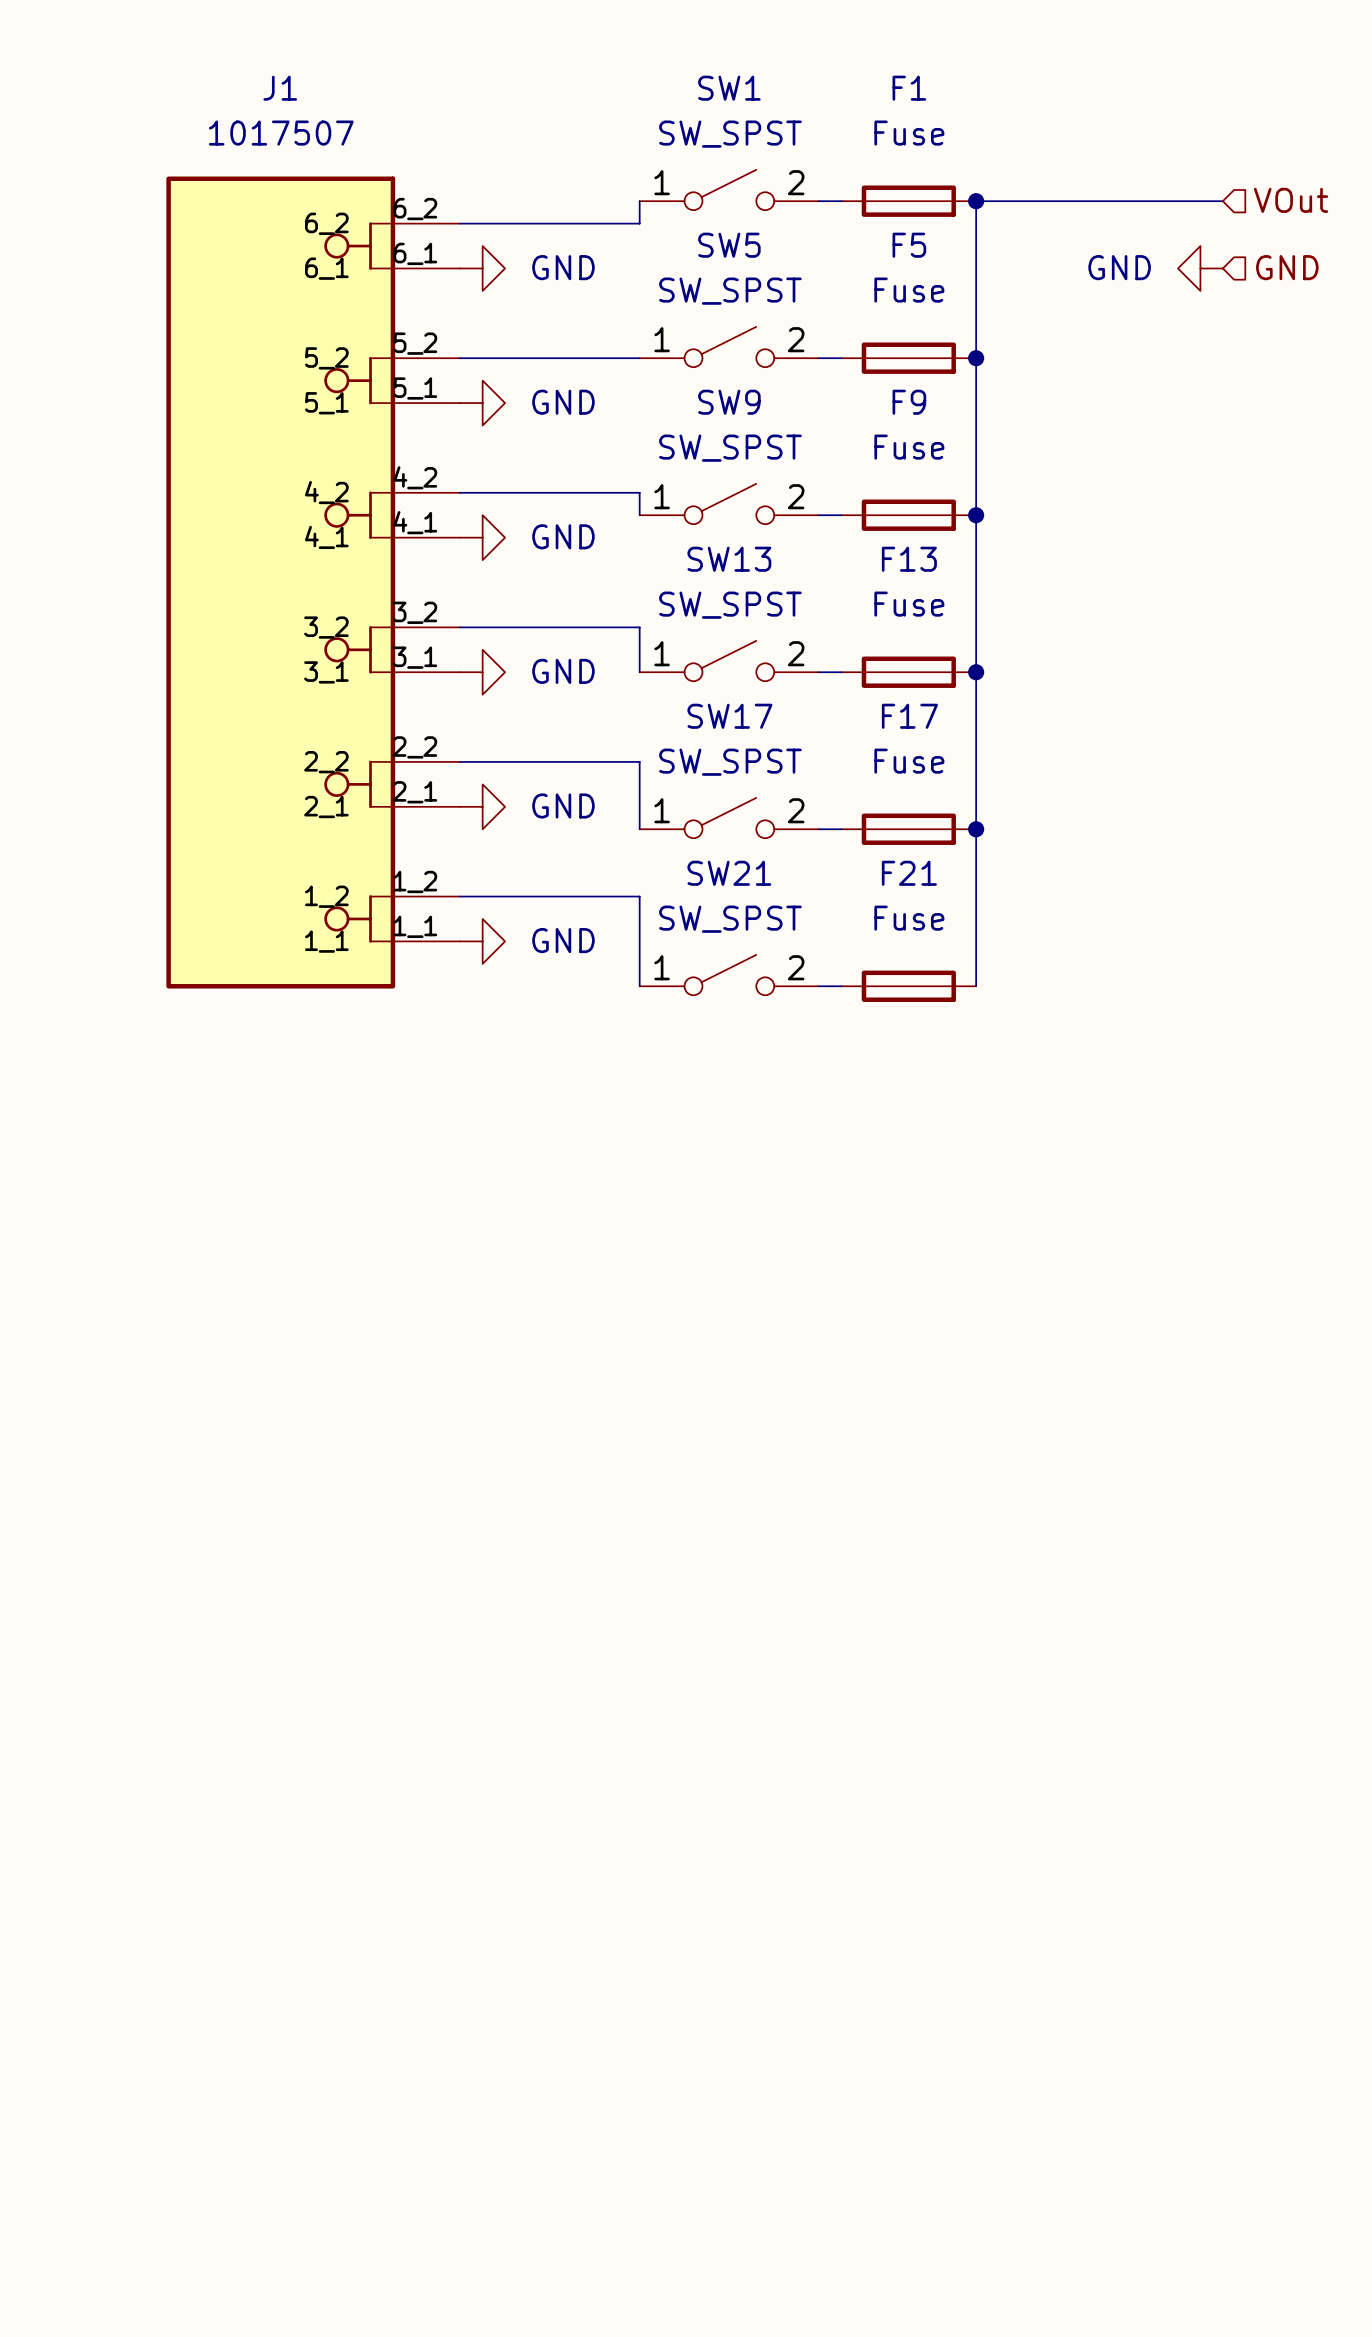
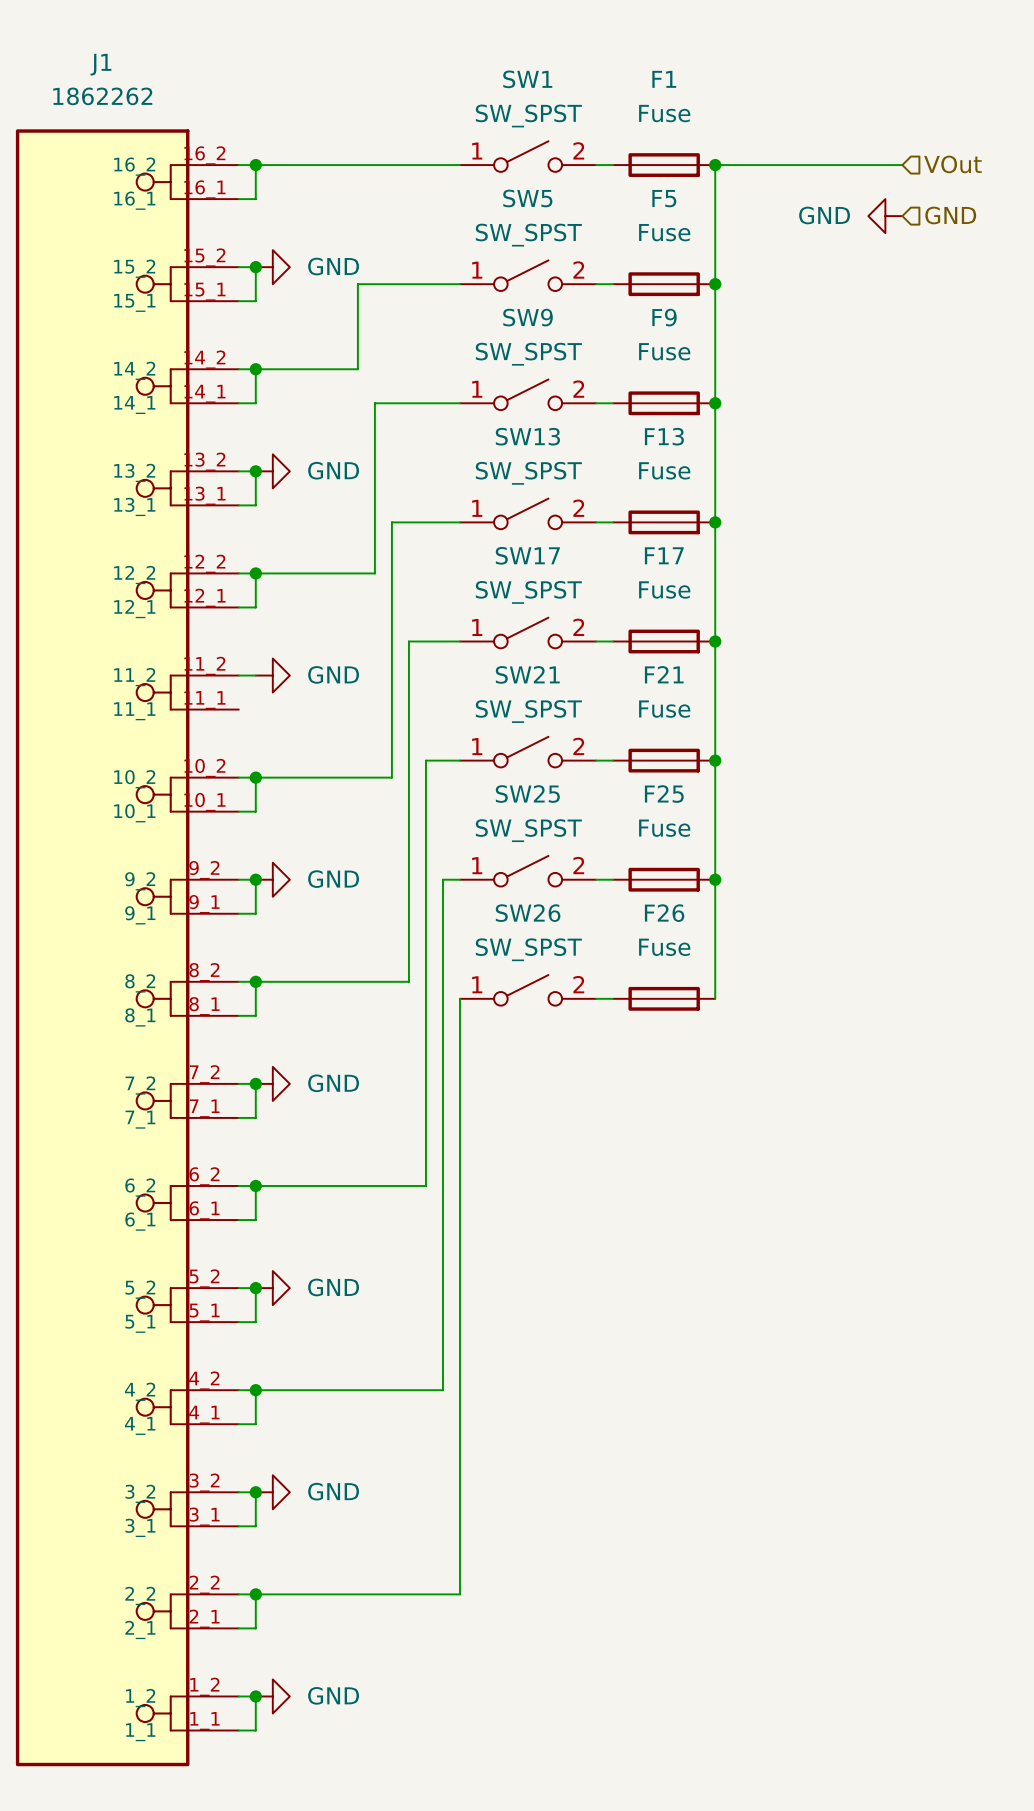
J1 name position: J1 (280, 88) -> J1 (100, 64)
J1 value: 1017507 (281, 133) -> 1862262 (102, 96)
J1 symbol: [166, 176, 461, 989] -> [15, 129, 239, 1767]
junction: none -> (255, 165)
wire: (639, 201) (639, 223) (460, 223) -> (459, 165) (238, 165)
power symbol: GND (482, 268) -> none
junction: none -> (255, 267)
power symbol: none -> GND (272, 267)
wire: (460, 358) (505, 358) -> (238, 369) (357, 369) (357, 284)
power symbol: GND (482, 403) -> none
junction: none -> (255, 369)
wire: (460, 492) (639, 492) (639, 515) -> (238, 573) (374, 573) (374, 403) (459, 403)
power symbol: GND (482, 537) -> none
junction: none -> (255, 471)
power symbol: none -> GND (272, 471)
wire: (460, 627) (639, 627) (639, 672) -> (238, 777) (391, 777) (391, 522) (459, 522)
power symbol: GND (482, 672) -> none
junction: none -> (255, 573)
wire: (460, 761) (639, 761) (639, 829) -> (238, 981) (408, 981) (408, 641) (459, 641)
power symbol: GND (482, 806) -> none
power symbol: none -> GND (272, 675)
wire: (460, 896) (639, 896) (639, 986) -> (238, 1186) (425, 1186) (425, 760) (459, 760)
power symbol: GND (482, 941) -> none
wire: none -> (715, 760) (715, 998)
junction: none -> (715, 760)
wire: none -> (255, 777) (255, 811) (238, 811)
junction: none -> (255, 777)
SW25: none -> SW_SPST (528, 871)
wire: none -> (238, 879) (255, 879) (255, 913) (238, 913)
junction: none -> (255, 879)
power symbol: none -> GND (272, 879)
wire: none -> (459, 879) (442, 879) (442, 1390) (238, 1390)
wire: none -> (596, 879) (613, 879)
F25: none -> Fuse (664, 879)
junction: none -> (715, 879)
wire: none -> (255, 981) (255, 1015) (238, 1015)
junction: none -> (255, 981)
SW26: none -> SW_SPST (528, 990)
wire: none -> (459, 998) (459, 1594) (238, 1594)
wire: none -> (596, 998) (613, 998)
F26: none -> Fuse (664, 998)
wire: none -> (238, 1083) (255, 1083) (255, 1117) (238, 1117)
junction: none -> (255, 1083)
power symbol: none -> GND (272, 1083)
wire: none -> (255, 1186) (255, 1220) (238, 1220)
junction: none -> (255, 1186)
wire: none -> (238, 1288) (255, 1288) (255, 1322) (238, 1322)
junction: none -> (255, 1288)
power symbol: none -> GND (272, 1288)
wire: none -> (255, 1390) (255, 1424) (238, 1424)
junction: none -> (255, 1390)
wire: none -> (238, 1492) (255, 1492) (255, 1526) (238, 1526)
junction: none -> (255, 1492)
power symbol: none -> GND (272, 1492)
wire: none -> (255, 1594) (255, 1628) (238, 1628)
junction: none -> (255, 1594)
wire: none -> (238, 1696) (255, 1696) (255, 1730) (238, 1730)
junction: none -> (255, 1696)
power symbol: none -> GND (272, 1696)

